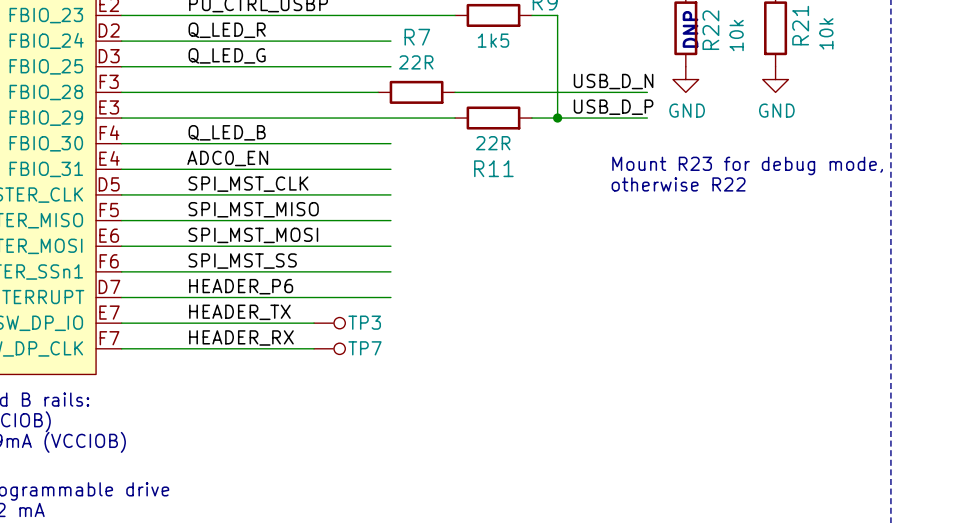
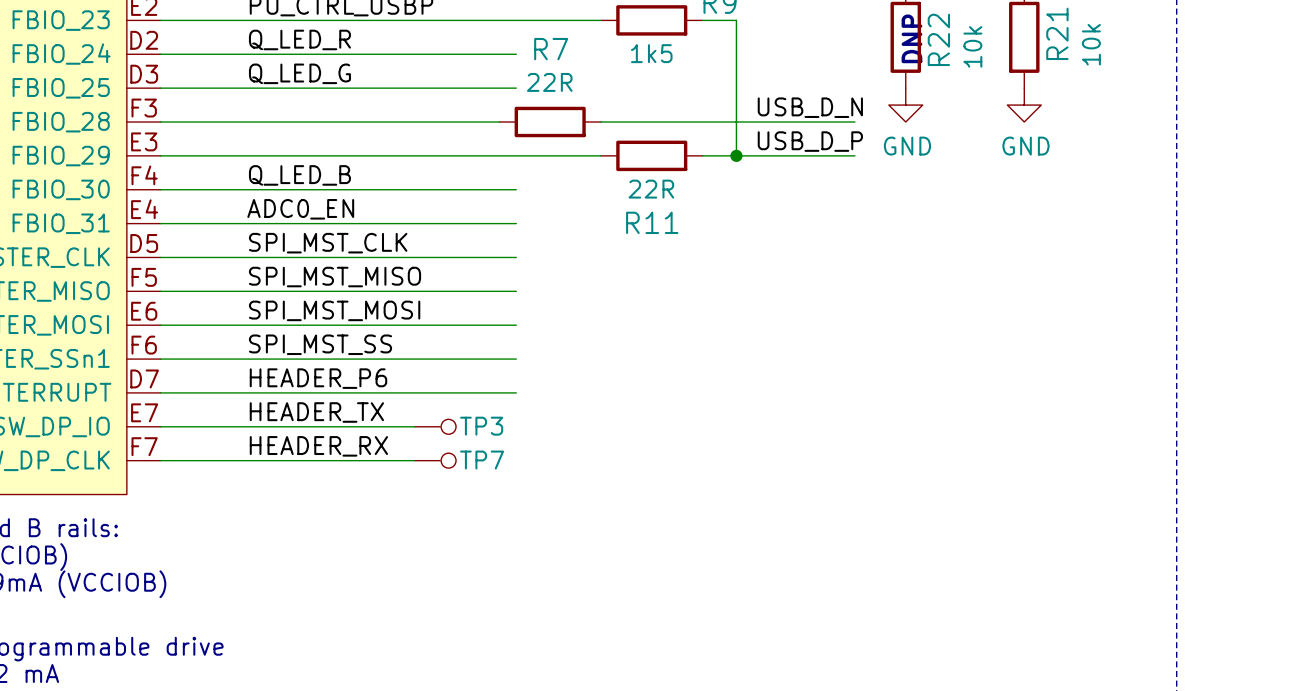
text: Mount R23 for debug mode, (747, 165) -> none
text: otherwise R22 (678, 184) -> none

